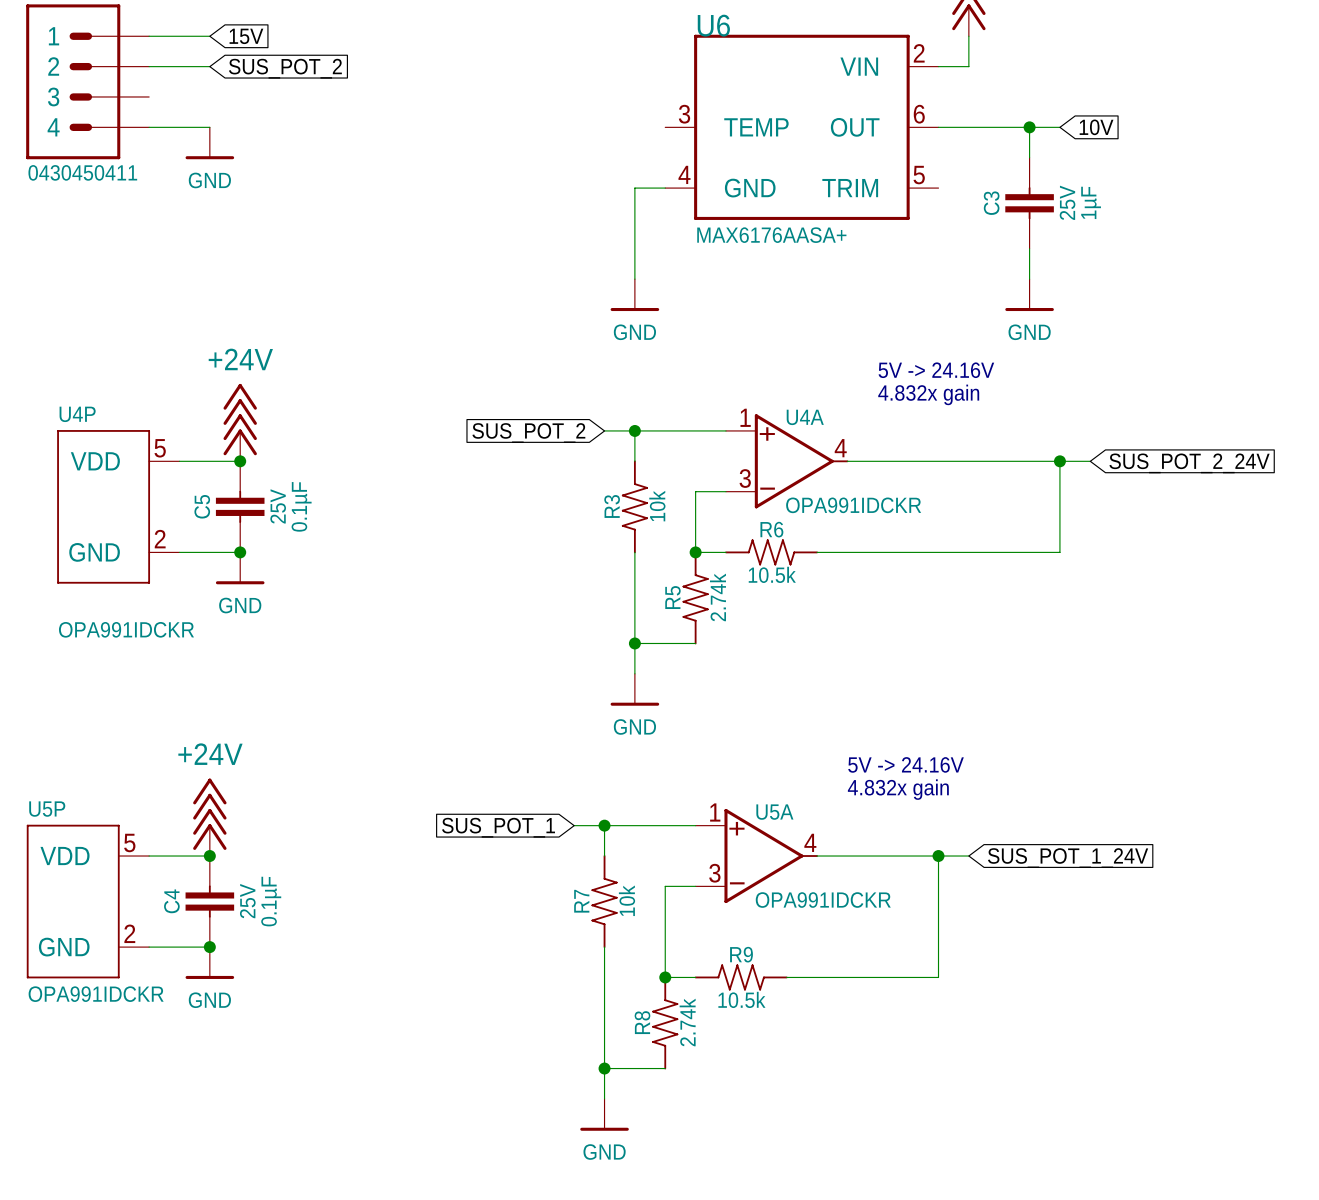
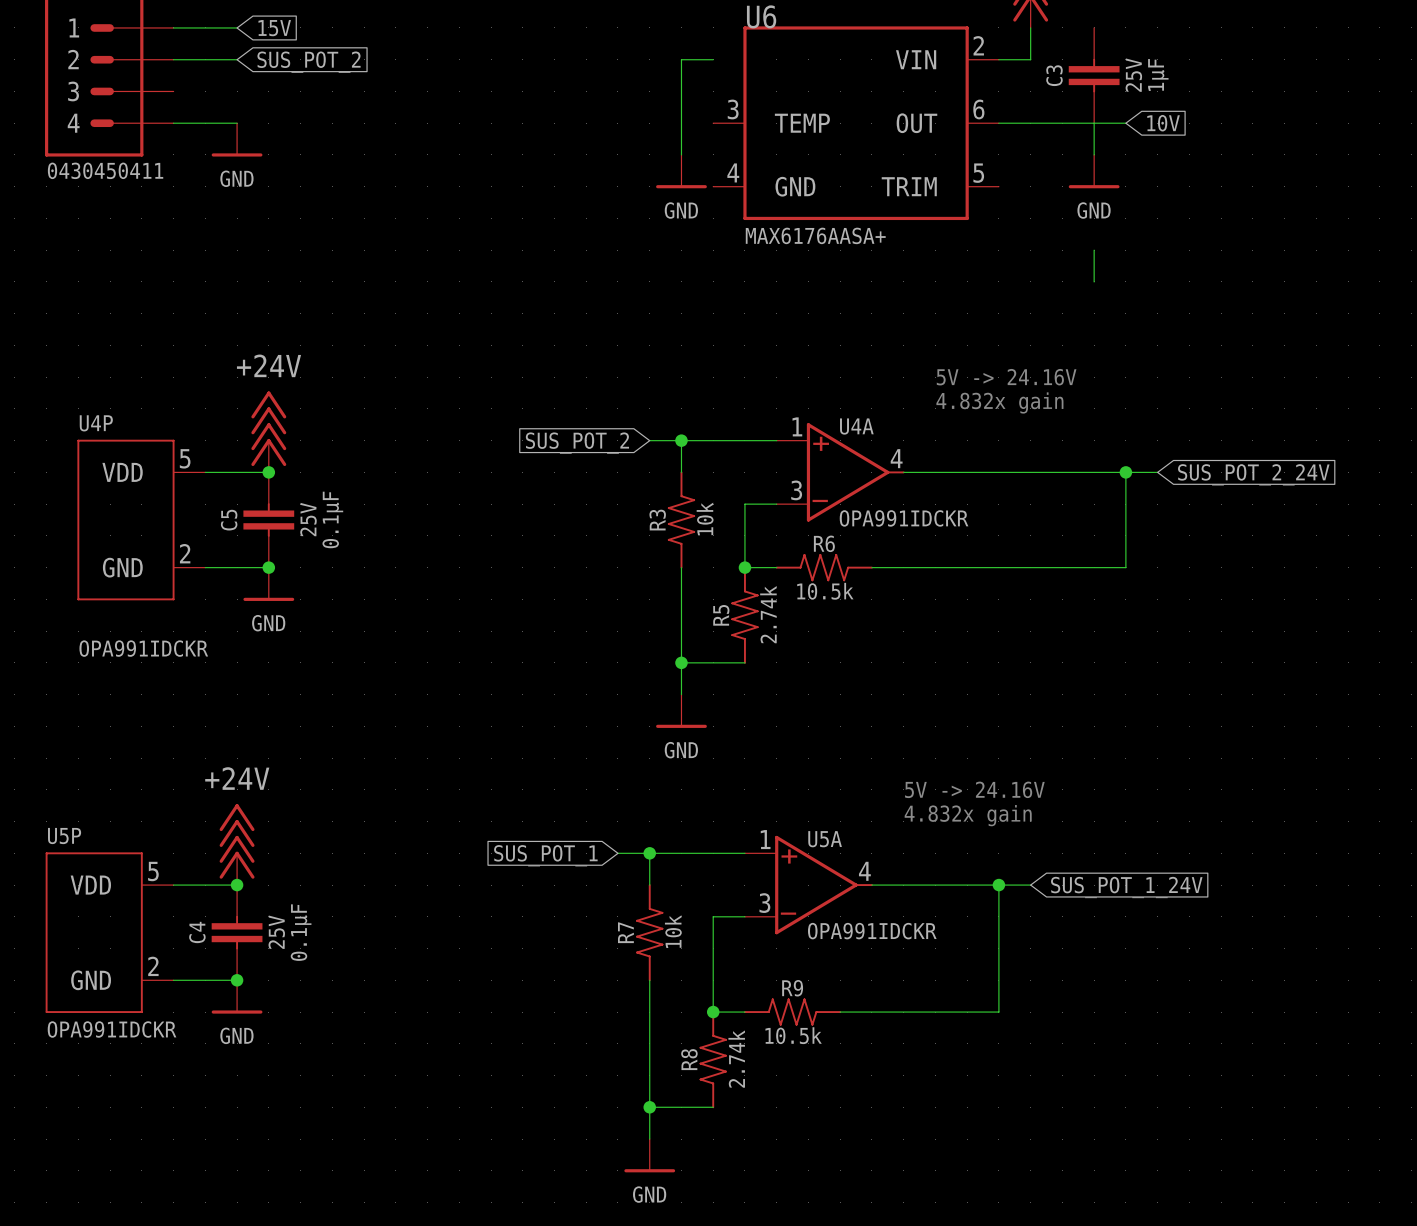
junction: (1029, 127) -> none
wire: (665, 188) (634, 188) (634, 279) -> (713, 59) (681, 59) (681, 154)
C3 position: (1029, 203) -> (1094, 75)
power symbol position: GND (634, 295) -> GND (681, 171)
power symbol position: GND (1029, 295) -> GND (1094, 171)

